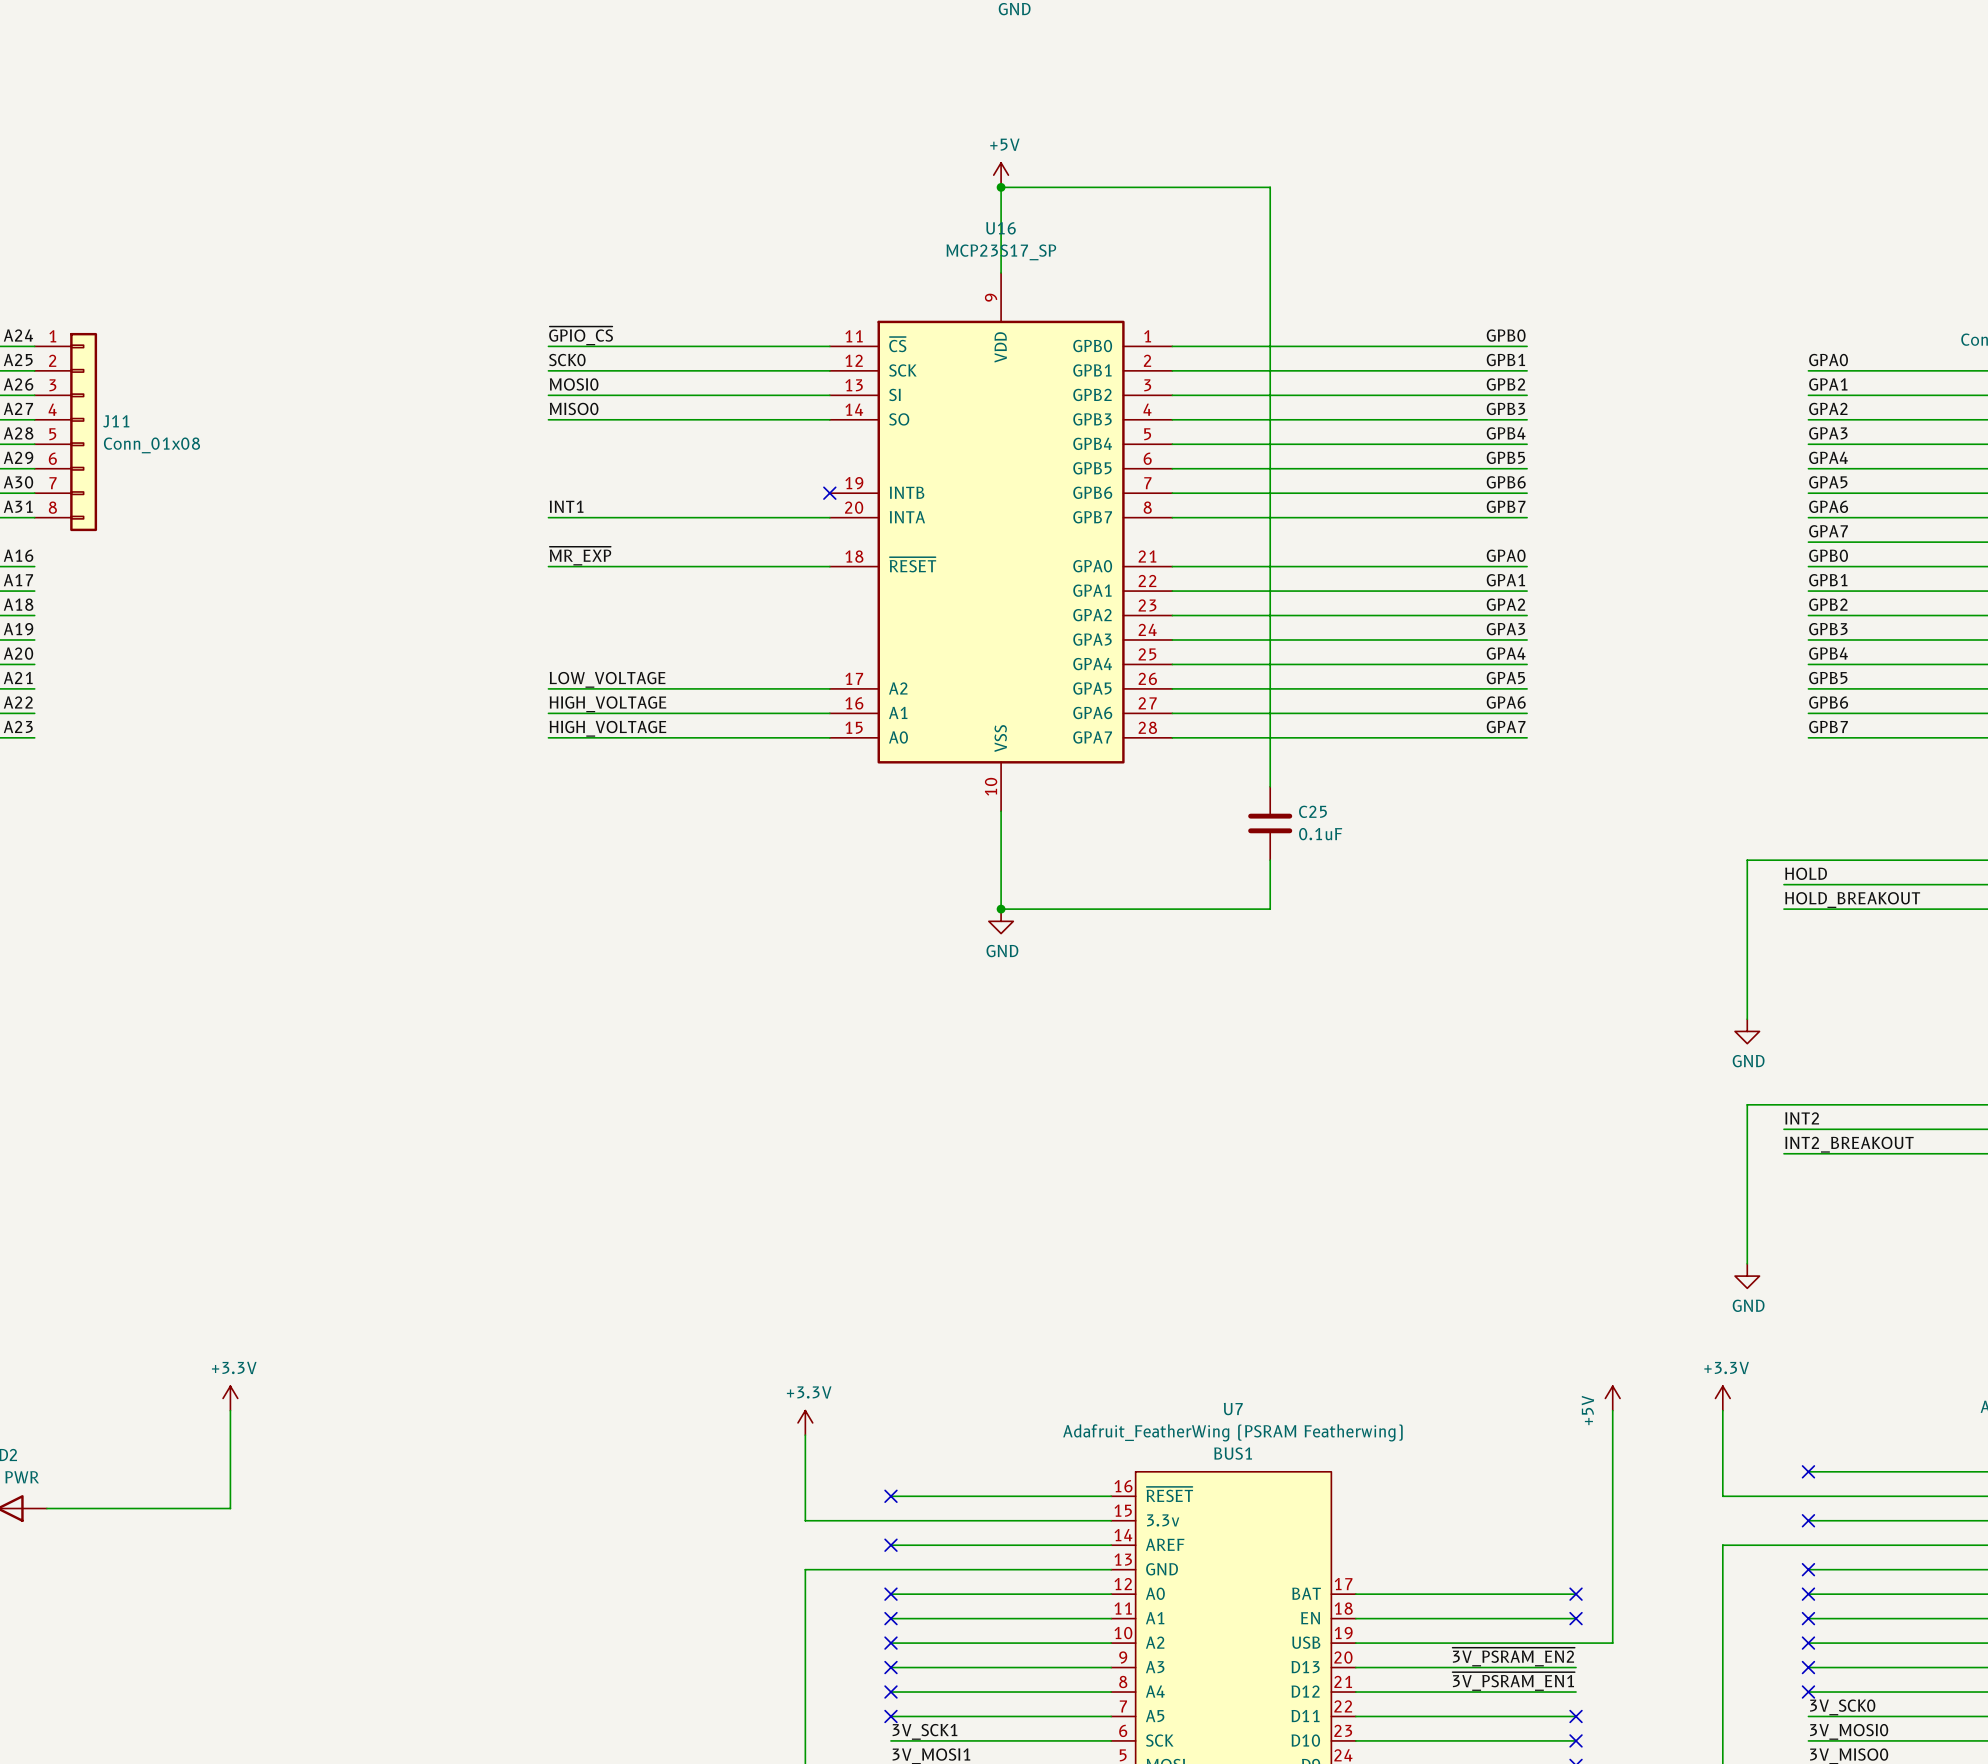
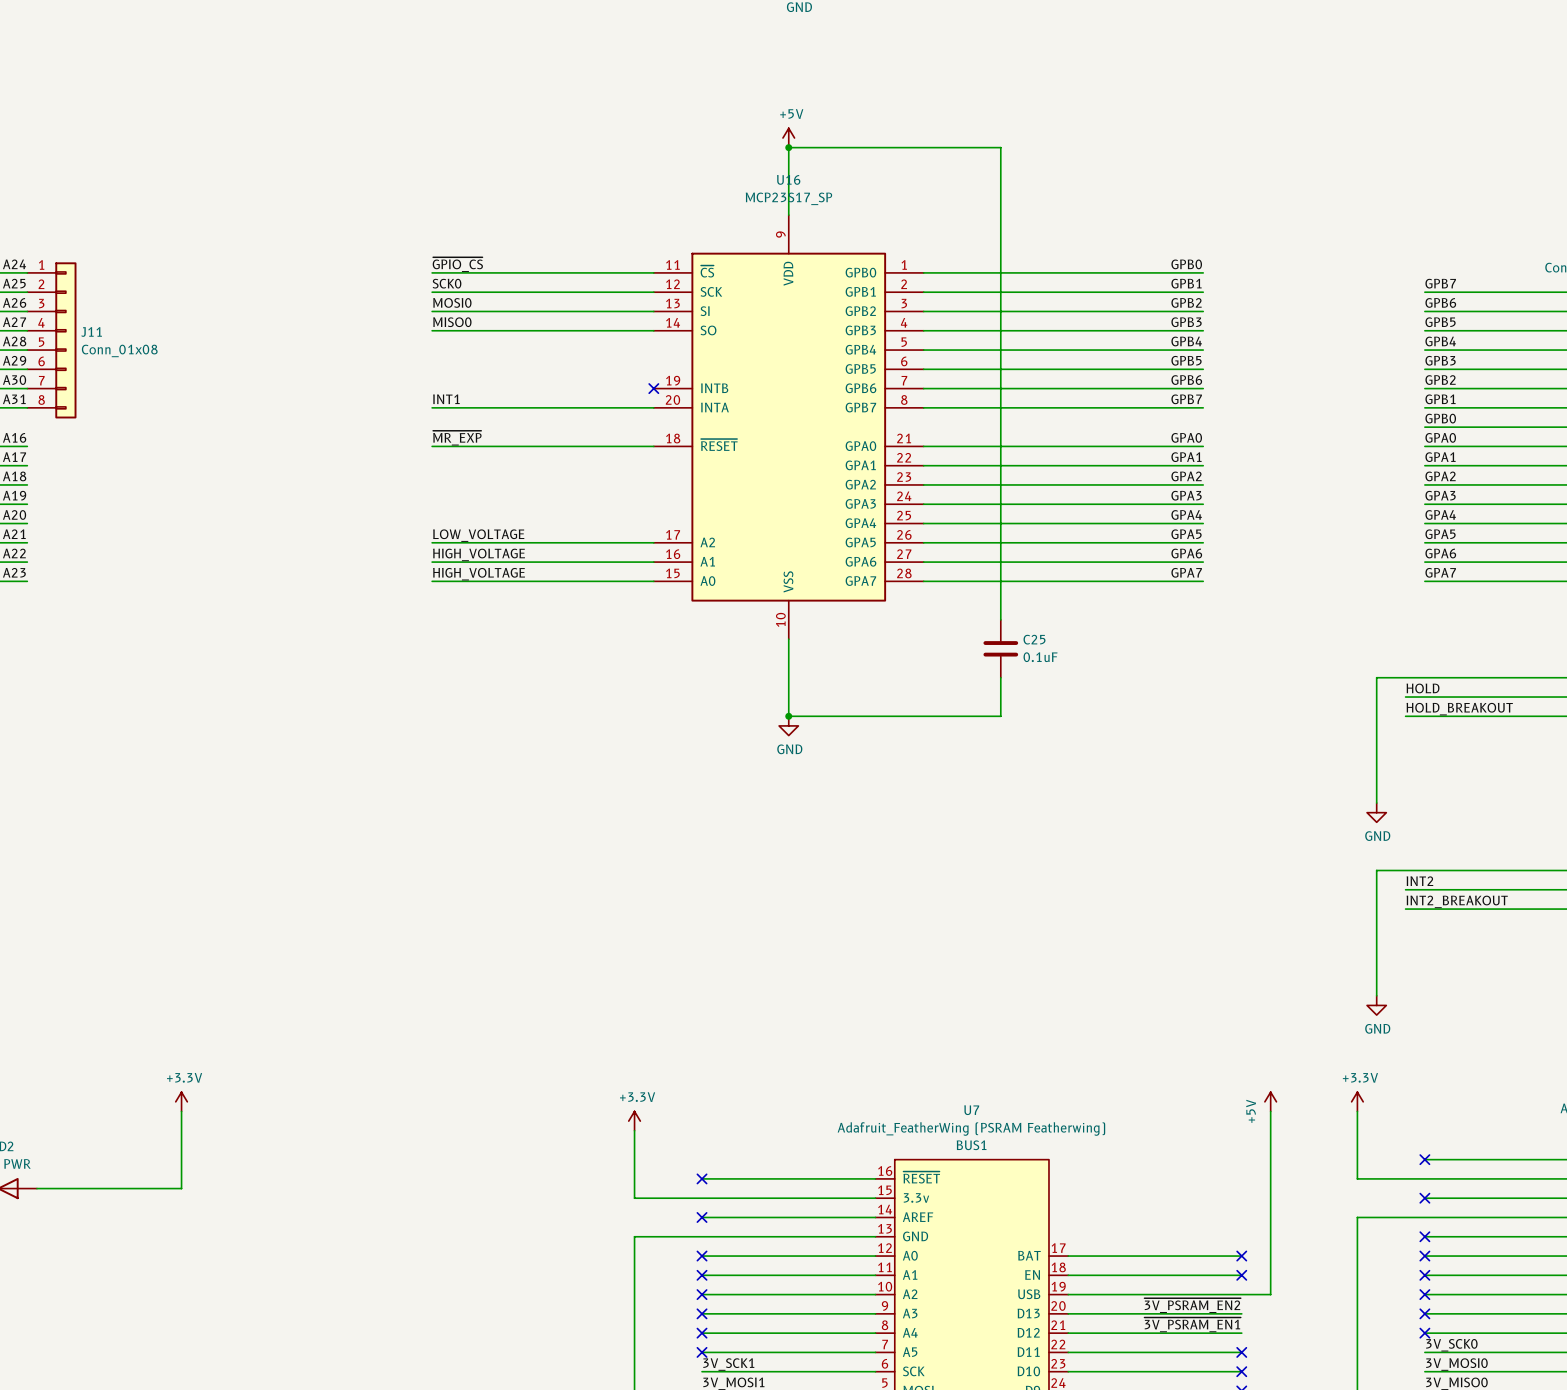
label: GPA0 (1828, 360) -> GPB7 (1440, 283)
label: GPA1 (1828, 384) -> GPB6 (1440, 302)
label: GPA2 (1828, 408) -> GPB5 (1440, 322)
label: GPA3 (1828, 433) -> GPB4 (1440, 341)
label: GPA4 (1828, 457) -> GPB3 (1440, 360)
label: GPA5 (1828, 482) -> GPB2 (1440, 380)
label: GPA6 (1828, 506) -> GPB1 (1440, 399)
label: GPA7 (1828, 531) -> GPB0 (1440, 418)
label: GPB0 (1828, 555) -> GPA0 (1440, 437)
label: GPB1 (1828, 580) -> GPA1 (1440, 457)
label: GPB2 (1828, 604) -> GPA2 (1440, 476)
label: GPB3 (1828, 629) -> GPA3 (1440, 495)
label: GPB4 (1828, 653) -> GPA4 (1440, 514)
label: GPB5 (1828, 678) -> GPA5 (1440, 534)
label: GPB6 (1828, 702) -> GPA6 (1440, 553)
label: GPB7 (1828, 727) -> GPA7 (1440, 572)

